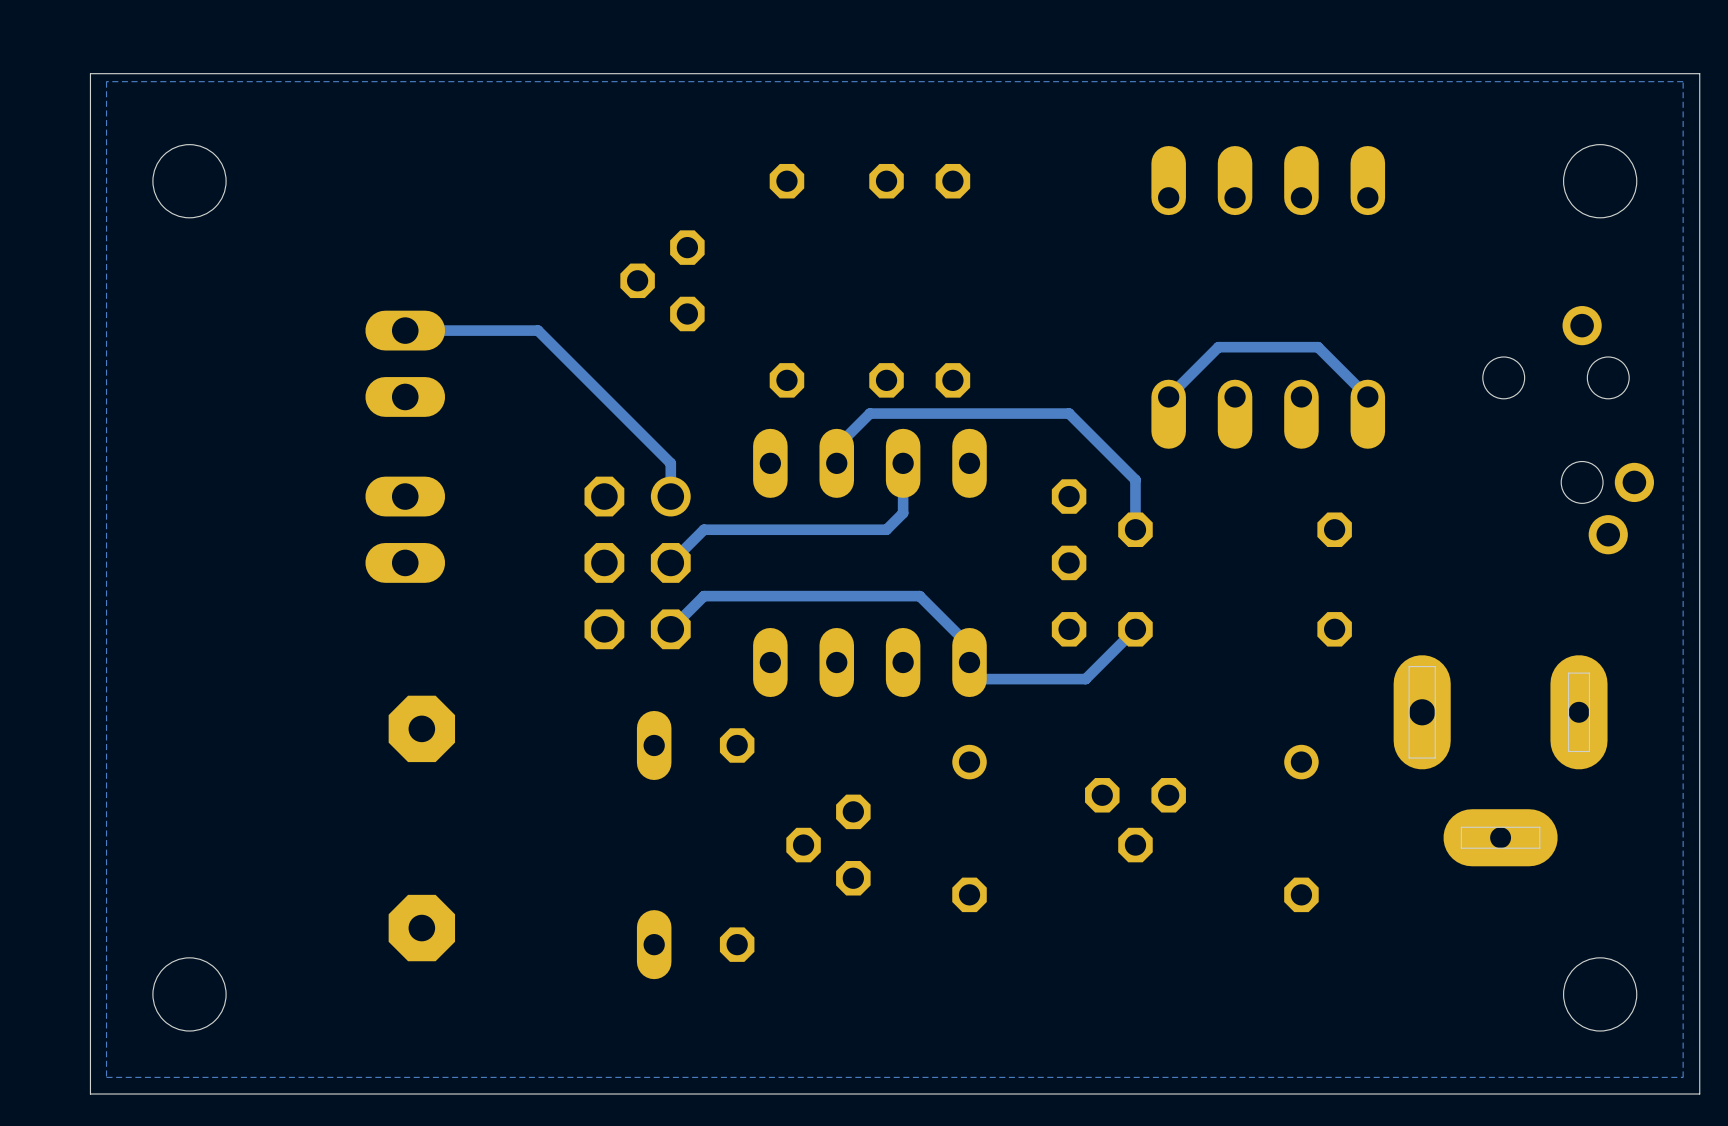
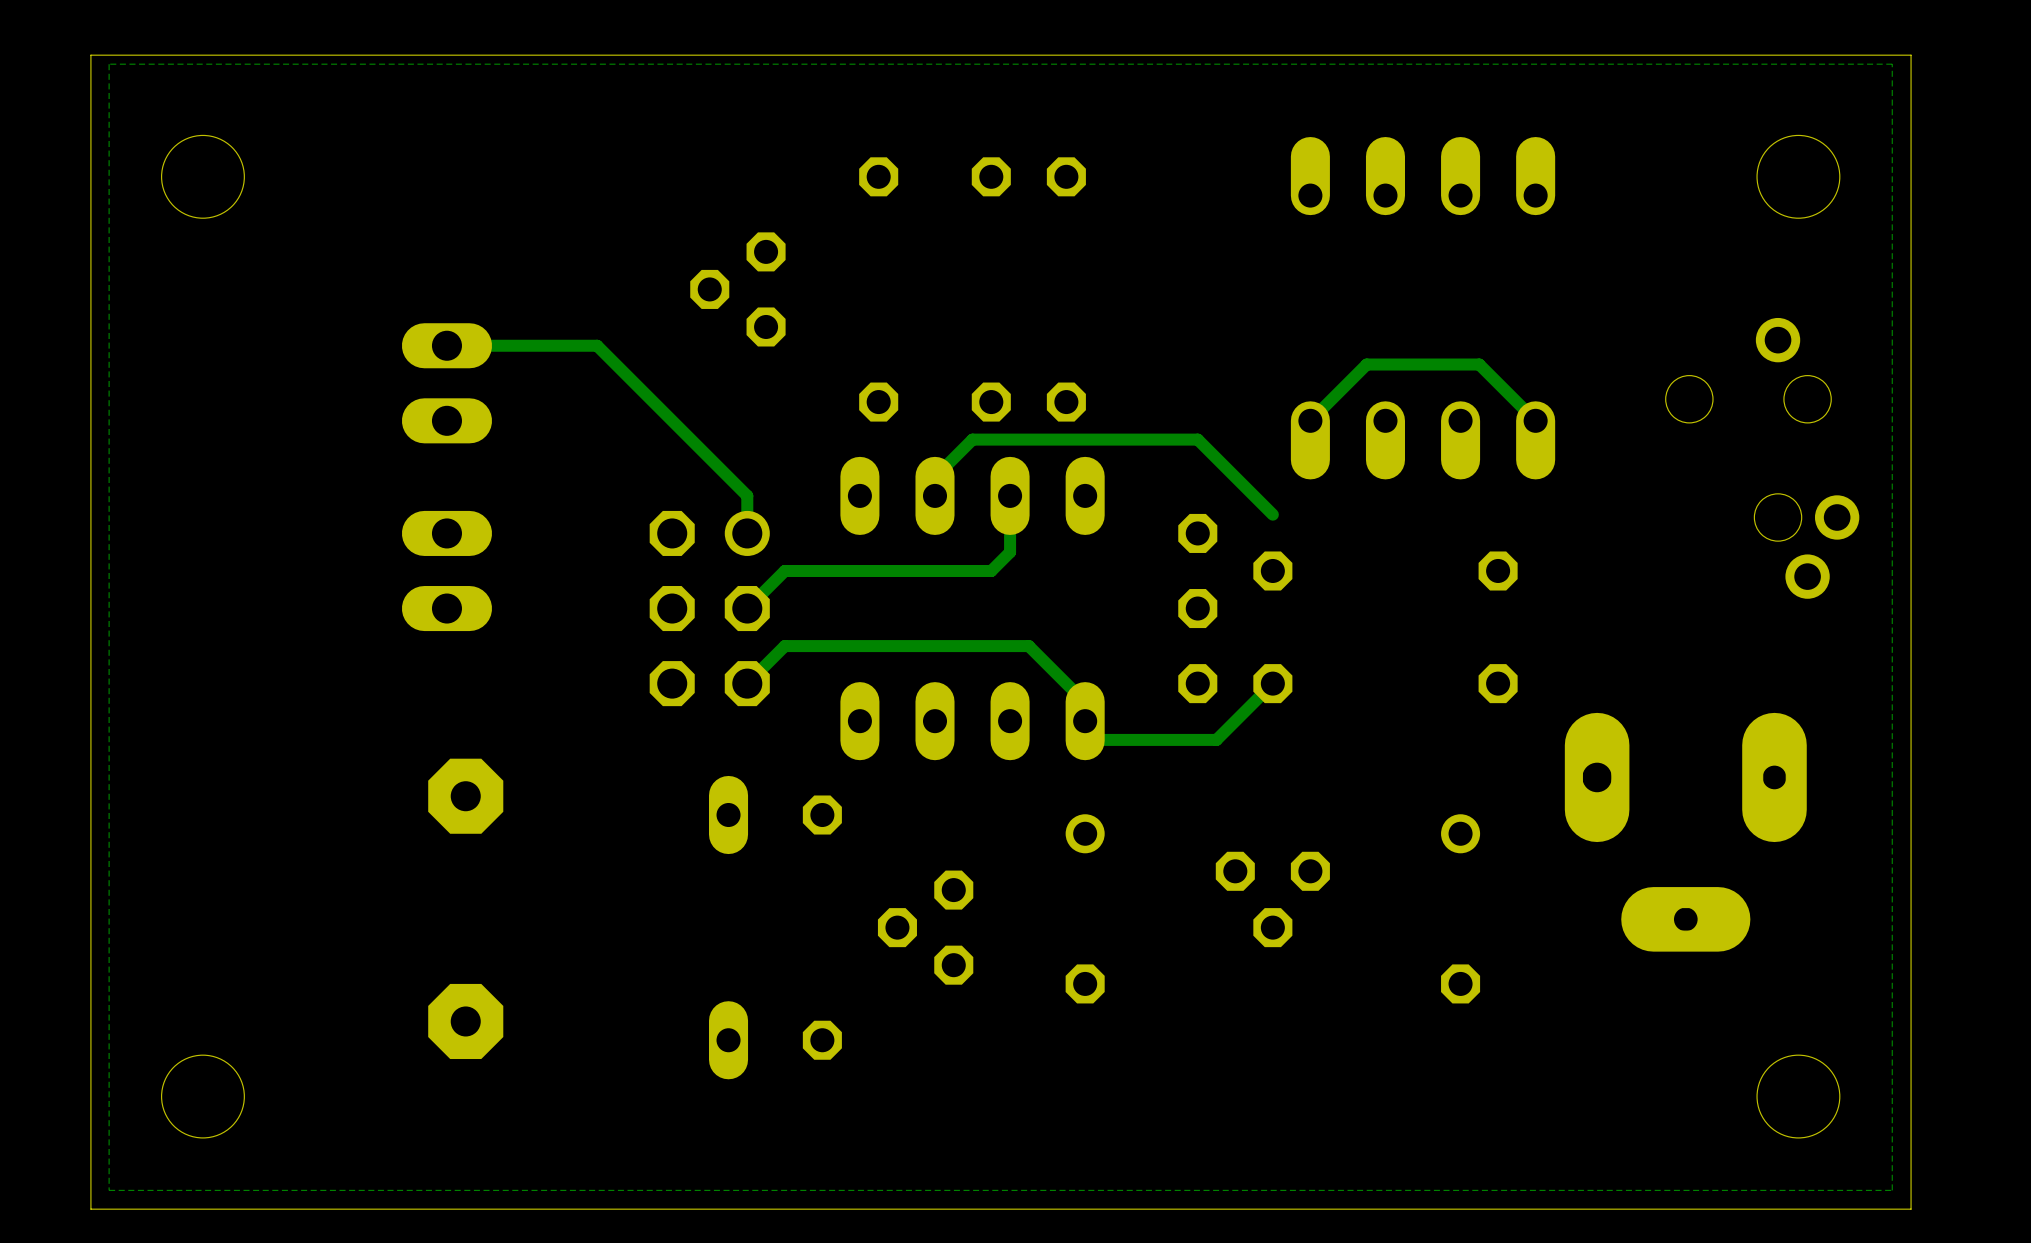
track: (1135, 479) (1135, 529) -> none

